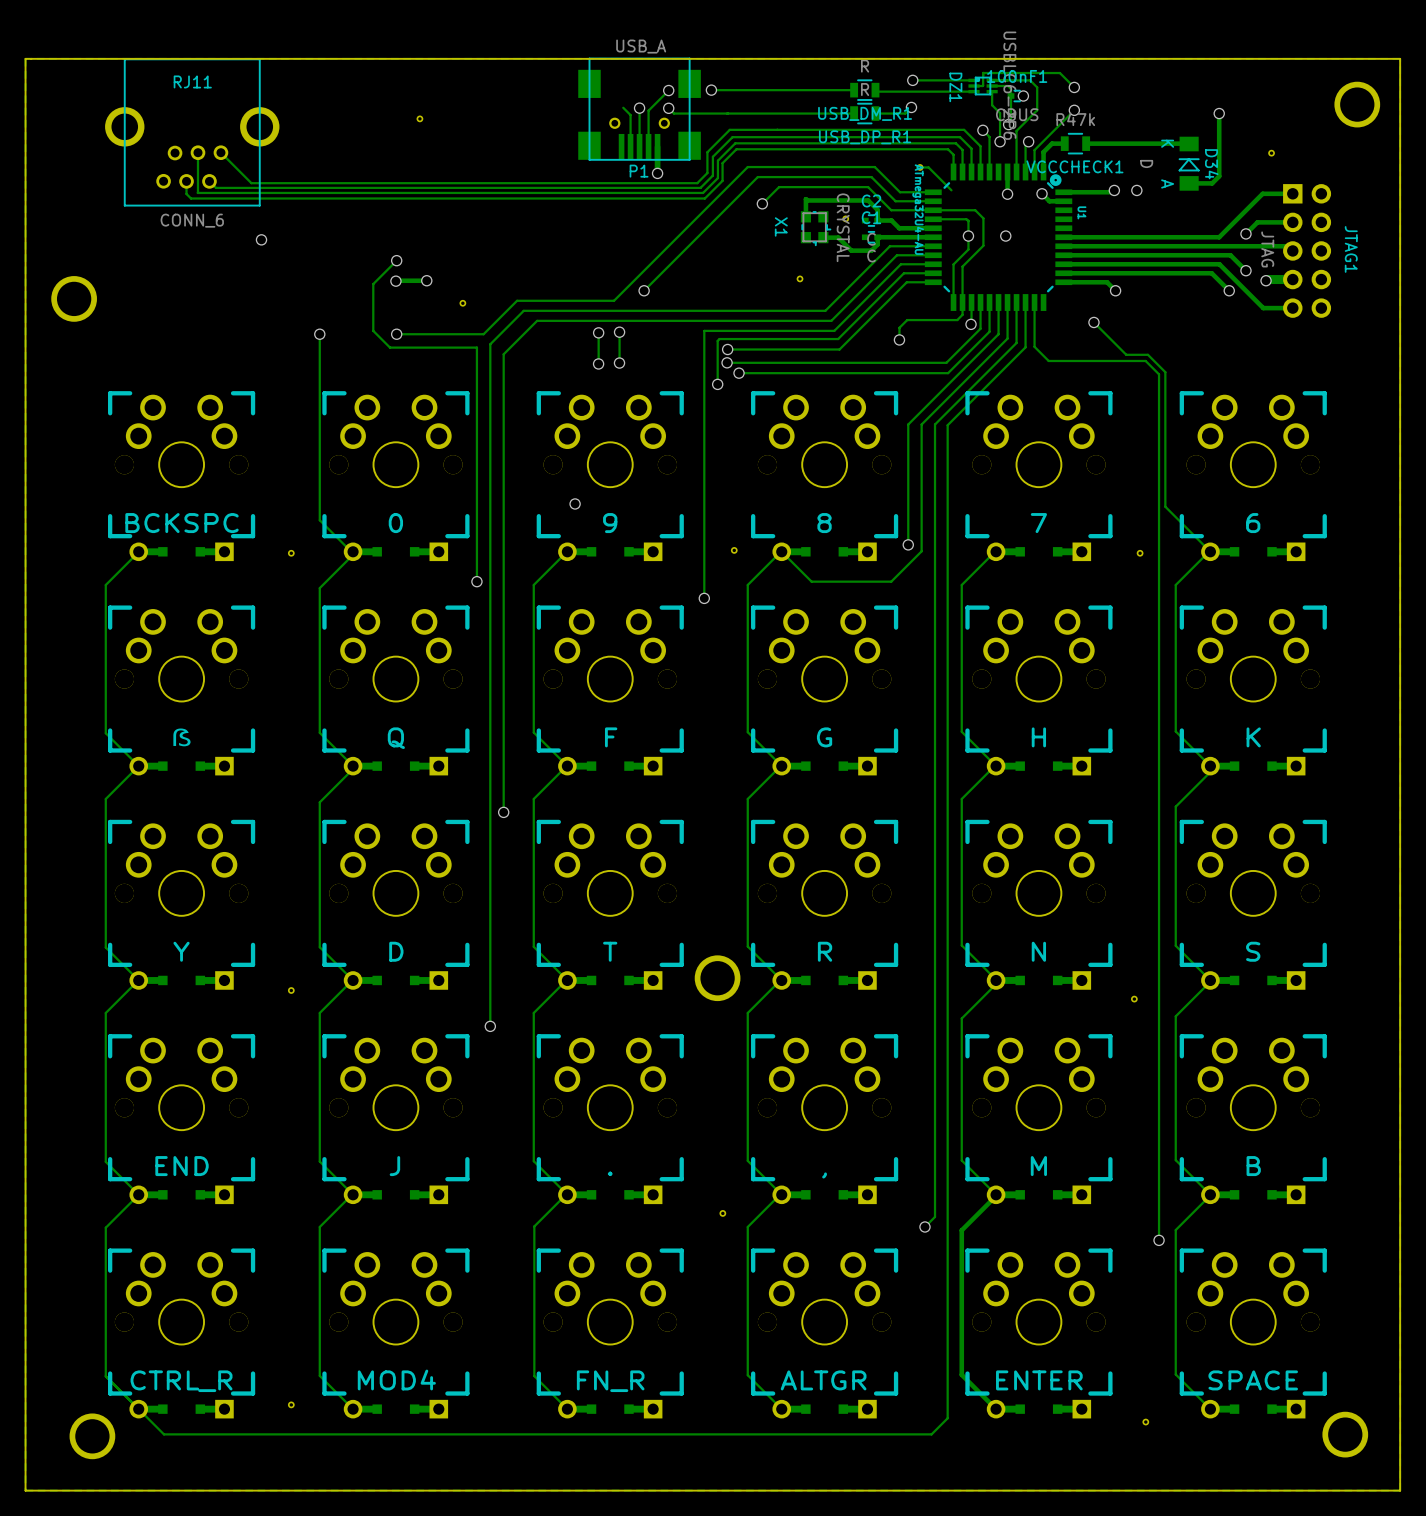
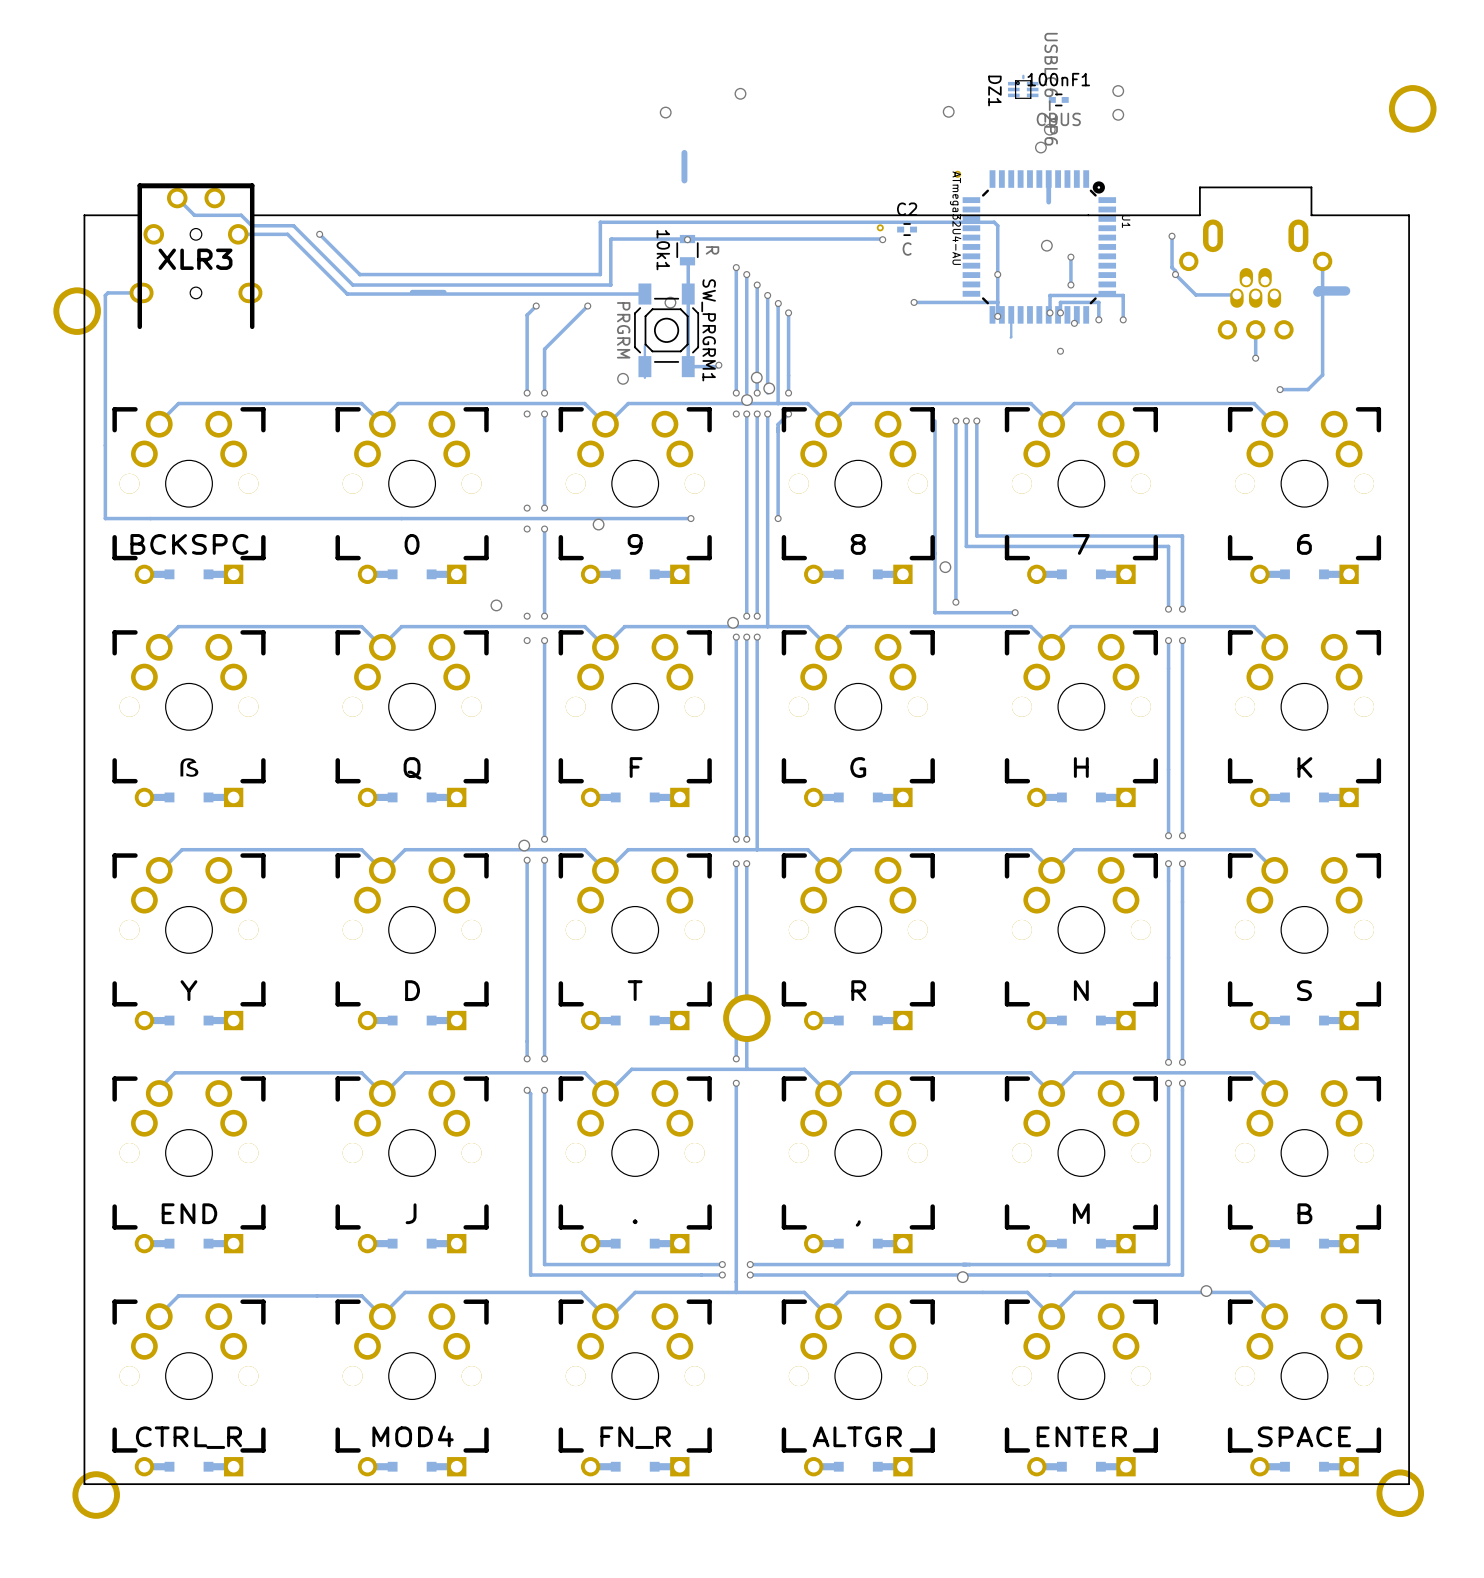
board edge: (1400, 58) (25, 58) (25, 1490) (1400, 1490) (1400, 58) -> (1311, 187) (1311, 215) (1409, 215) (1409, 1484) (84, 1484) (84, 215) (140, 215) (140, 187) (251, 187) (251, 215) (1199, 215) (1199, 187) (1311, 187)
track: (983, 73) (1059, 73) (1074, 87) -> none
track: (983, 75) (983, 85) (974, 86) -> none
via: (912, 80) -> none
track: (974, 80) (912, 80) -> none
track: (992, 80) (1030, 80) (1037, 87) (1037, 110) (1016, 130) (1016, 172) -> none
track: (992, 86) (1008, 86) (1011, 88) (1011, 122) (1008, 124) -> none
track: (668, 90) (648, 110) (648, 146) -> none
via: (668, 90) -> none
track: (854, 90) (711, 90) -> none
USB_DM_R1: R (864, 90) -> none
track: (875, 90) (974, 91) -> none
track: (994, 91) (992, 91) (992, 105) (1000, 113) (1000, 141) -> none
via: (1023, 96) -> none
track: (623, 107) (630, 115) (630, 146) -> none
track: (911, 107) (905, 113) (875, 113) -> none
track: (639, 108) (639, 146) -> none
track: (668, 108) (673, 113) (854, 113) -> none
via: (668, 108) -> none
P1: USB_A (639, 109) -> none
track: (1074, 110) (1034, 150) (1034, 172) -> none
USB_DP_R1: R (864, 113) -> none
track: (1219, 113) (1219, 176) (1212, 183) (1189, 183) -> none
via: (1219, 113) -> none
part: (419, 118) -> none
track: (982, 130) (989, 136) (989, 172) -> none
via: (982, 130) -> none
RJ11: CONN_6 (192, 132) -> none
track: (1028, 141) (1025, 144) (1025, 172) -> none
via: (1028, 141) -> none
track: (1064, 143) (1052, 143) (1043, 152) (1043, 172) -> none
VCCCHECK1: R47k (1075, 143) -> none
track: (1086, 143) (1189, 144) -> none
track: (198, 152) (197, 192) (703, 192) (717, 178) (717, 160) (735, 143) (955, 143) (962, 149) (962, 172) -> none
track: (220, 152) (251, 183) (697, 183) (707, 173) (707, 152) (729, 129) (964, 129) (980, 146) (980, 172) -> none
part: (1271, 153) -> none
D34: D (1189, 163) -> none
track: (920, 167) (928, 167) (951, 190) -> none
track: (953, 172) (953, 154) (948, 149) (736, 149) (722, 163) (722, 180) (704, 198) (191, 198) (186, 194) (186, 181) -> none
track: (971, 172) (971, 148) (960, 137) (732, 137) (712, 156) (712, 175) (700, 187) (216, 187) (209, 181) -> none
via: (657, 173) -> none
track: none -> (177, 198) (194, 215) (241, 215) (251, 225) (293, 225) (352, 285) (610, 285) (611, 239) (882, 239)
track: (1114, 190) (1112, 192) (1063, 192) -> none
via: (1114, 190) -> none
via: (1136, 190) -> none
track: (933, 192) (900, 192) (874, 167) (747, 167) (614, 300) (517, 300) (483, 334) (396, 334) -> none
track: (1042, 193) (1049, 201) (1063, 201) -> none
via: (1042, 193) -> none
track: (1292, 193) (1262, 193) (1219, 237) (1063, 237) -> none
via: (1007, 194) -> none
track: (933, 201) (895, 201) (871, 177) (757, 177) (644, 290) -> none
track: (762, 203) (779, 187) (868, 187) (891, 210) (975, 210) (983, 218) (983, 245) (962, 266) (962, 314) (957, 320) (907, 320) (899, 327) (899, 339) -> none
via: (762, 203) -> none
track: (805, 216) (805, 199) (868, 200) (877, 210) (877, 220) (891, 220) (899, 228) (933, 228) -> none
track: (933, 219) (966, 219) (968, 221) -> none
track: (968, 220) (968, 249) (953, 264) (953, 302) -> none
track: (1292, 222) (1257, 222) (1245, 233) -> none
track: none -> (238, 234) (287, 234) (347, 294) (644, 294)
track: none -> (319, 234) (359, 274)
via: none -> (319, 234)
track: none -> (1172, 236) (1172, 267) (1175, 271) (1175, 274) (1195, 294) (1236, 294)
via: none -> (1172, 236)
X1: CRYSTAL (816, 228) -> none
via: none -> (687, 239)
via: none -> (882, 239)
via: (1245, 233) -> none
via: (968, 236) -> none
C1: C (871, 237) -> none
track: (933, 237) (877, 237) (877, 244) (871, 250) (851, 250) (838, 237) (823, 237) -> none
via: (261, 239) -> none
10k1: none -> R (687, 250)
part: none -> XLR3 (195, 256)
track: (933, 246) (889, 246) (825, 310) (523, 310) (490, 344) (490, 1026) -> none
track: (1063, 246) (1288, 246) (1292, 250) -> none
track: none -> (1070, 257) (1070, 285)
via: none -> (1070, 257)
JTAG1: JTAG (1307, 250) -> none
track: none -> (687, 261) (688, 366) (718, 365)
track: none -> (1322, 261) (1322, 374) (1307, 389) (1280, 389)
track: (933, 255) (896, 255) (831, 320) (537, 320) (503, 354) (503, 812) -> none
track: (1063, 255) (1230, 255) (1245, 270) -> none
track: none -> (736, 267) (736, 393)
via: none -> (736, 267)
track: (396, 260) (373, 284) (373, 330) (390, 347) (476, 347) (476, 581) -> none
via: (396, 260) -> none
track: none -> (359, 274) (600, 274) (600, 222) (994, 222) (997, 225) (997, 316)
track: none -> (746, 274) (746, 393)
via: none -> (746, 274)
via: none -> (997, 274)
via: none -> (1175, 274)
track: (933, 264) (900, 264) (834, 330) (704, 330) (704, 598) -> none
track: (1063, 264) (1219, 264) (1263, 308) (1292, 308) -> none
part: none -> (1255, 279)
via: (1245, 270) -> none
track: none -> (757, 285) (757, 393)
via: none -> (757, 285)
track: (933, 273) (903, 273) (838, 339) (719, 339) (717, 340) (717, 384) -> none
via: none -> (1070, 285)
track: (1063, 273) (1211, 273) (1229, 290) -> none
part: (800, 278) -> none
via: (426, 280) -> none
via: (1266, 280) -> none
track: none -> (141, 292) (107, 292) (105, 295) (105, 518) (690, 518)
via: (395, 281) -> none
track: (933, 282) (906, 282) (839, 349) (727, 349) -> none
track: (1063, 282) (1107, 282) (1115, 290) -> none
track: none -> (767, 295) (767, 393)
via: none -> (767, 295)
via: none -> (914, 302)
track: none -> (997, 302) (914, 302)
via: (1115, 290) -> none
via: (1229, 290) -> none
track: none -> (778, 303) (778, 403)
via: none -> (778, 303)
track: none -> (536, 306) (527, 315) (527, 393)
via: none -> (536, 306)
track: none -> (587, 306) (544, 349) (544, 393)
via: none -> (587, 306)
track: none -> (788, 312) (788, 393)
via: none -> (788, 312)
track: none -> (1050, 312) (1050, 295) (1123, 295) (1123, 319)
via: none -> (1050, 312)
track: none -> (1060, 312) (1060, 302) (1098, 302) (1098, 319)
via: none -> (1060, 312)
track: (980, 302) (980, 328) (946, 362) (727, 362) -> none
track: (989, 302) (989, 331) (948, 373) (739, 373) -> none
track: (998, 302) (998, 334) (908, 424) (908, 544) -> none
track: (1007, 302) (1007, 338) (921, 424) (921, 551) (891, 581) (811, 581) (781, 551) -> none
track: (1016, 302) (1016, 342) (935, 424) (935, 1216) (924, 1226) -> none
track: (1025, 302) (1025, 347) (947, 425) (947, 1418) (931, 1434) (163, 1434) (105, 1376) (105, 1227) (138, 1194) -> none
track: (1034, 302) (1034, 346) (1048, 360) (1145, 360) (1159, 374) (1159, 1240) -> none
part: (462, 303) -> none
via: none -> (997, 316)
via: none -> (1098, 319)
via: none -> (1123, 319)
via: none -> (1074, 323)
track: none -> (1255, 329) (1255, 358)
SW_PRGRM1: none -> PRGRM (666, 330)
track: (1093, 322) (1126, 354) (1147, 354) (1165, 372) (1165, 506) (1210, 551) -> none
via: (1093, 322) -> none
via: (971, 324) -> none
track: (598, 332) (598, 363) -> none
via: (598, 332) -> none
via: (619, 332) -> none
track: (319, 334) (319, 520) (353, 551) (353, 554) (319, 588) (319, 732) (353, 766) -> none
via: (319, 334) -> none
via: (396, 334) -> none
via: none -> (1060, 351)
via: (899, 339) -> none
via: none -> (1255, 358)
via: (727, 349) -> none
via: none -> (718, 365)
via: (619, 363) -> none
via: none -> (1280, 389)
via: none -> (527, 393)
via: none -> (544, 393)
via: none -> (736, 393)
via: none -> (757, 393)
via: none -> (788, 393)
via: none -> (527, 413)
track: none -> (544, 413) (544, 508)
via: none -> (544, 413)
via: none -> (736, 413)
track: none -> (746, 413) (746, 616)
via: none -> (746, 413)
track: none -> (757, 413) (757, 616)
via: none -> (757, 413)
track: none -> (767, 413) (767, 626)
via: none -> (767, 413)
track: none -> (788, 413) (778, 424) (778, 518)
via: none -> (788, 413)
track: none -> (934, 420) (934, 612) (1015, 612)
track: none -> (955, 420) (955, 602)
via: none -> (955, 420)
track: none -> (966, 420) (966, 546) (1168, 546) (1168, 609)
via: none -> (966, 420)
track: none -> (976, 420) (976, 535) (1182, 535) (1182, 609)
via: none -> (976, 420)
track: none -> (1274, 424) (1254, 403) (1074, 403) (1053, 424) (1030, 403) (851, 403) (830, 424) (807, 403) (628, 403) (607, 424) (584, 403) (398, 403) (382, 419) (382, 424) (361, 403) (178, 403) (159, 424)
via: none -> (527, 508)
via: none -> (544, 508)
via: none -> (690, 518)
via: none -> (778, 518)
via: none -> (527, 529)
track: none -> (544, 529) (544, 616)
via: none -> (544, 529)
part: (734, 550) -> none
track: (138, 551) (105, 585) (105, 733) (138, 766) -> none
track: (567, 551) (533, 585) (533, 732) (567, 766) (533, 799) (533, 946) (567, 980) (533, 1012) (533, 1161) (567, 1194) (534, 1226) (534, 1376) (567, 1409) -> none
track: (780, 551) (747, 585) (747, 732) (781, 766) -> none
track: (996, 551) (961, 585) (961, 731) (996, 766) (961, 799) (961, 945) (996, 979) (996, 984) (961, 1018) (961, 1160) (996, 1194) (961, 1230) (961, 1374) (996, 1409) -> none
track: (1210, 551) (1175, 585) (1175, 731) (1210, 766) -> none
part: (291, 553) -> none
part: (1140, 553) -> none
via: none -> (955, 602)
via: none -> (1168, 609)
via: none -> (1182, 609)
via: none -> (1015, 612)
via: none -> (527, 616)
via: none -> (544, 616)
via: none -> (746, 616)
via: none -> (757, 616)
track: none -> (736, 637) (736, 839)
via: none -> (736, 637)
track: none -> (746, 637) (746, 839)
via: none -> (746, 637)
track: none -> (757, 637) (757, 849)
via: none -> (757, 637)
via: none -> (527, 640)
track: none -> (544, 640) (544, 839)
via: none -> (544, 640)
track: none -> (1168, 640) (1168, 835)
via: none -> (1168, 640)
track: none -> (1182, 640) (1182, 835)
via: none -> (1182, 640)
track: none -> (1274, 647) (1254, 626) (1070, 626) (1051, 647) (1030, 626) (847, 626) (828, 647) (807, 626) (624, 626) (605, 647) (584, 626) (401, 626) (382, 647) (361, 626) (178, 626) (159, 647)
track: (138, 766) (105, 799) (105, 947) (138, 980) (105, 1012) (105, 1161) (138, 1194) -> none
track: (780, 766) (747, 799) (747, 946) (781, 980) -> none
track: (1210, 766) (1210, 772) (1175, 806) (1175, 945) (1210, 980) (1175, 1016) (1175, 1160) (1210, 1194) -> none
track: (353, 769) (319, 802) (319, 947) (353, 980) -> none
via: none -> (1168, 835)
via: none -> (1182, 835)
via: none -> (544, 839)
via: none -> (736, 839)
via: none -> (746, 839)
track: none -> (527, 860) (527, 1058)
via: none -> (527, 860)
track: none -> (544, 860) (544, 1058)
via: none -> (544, 860)
track: none -> (736, 863) (736, 1058)
via: none -> (736, 863)
track: none -> (746, 863) (746, 1069)
via: none -> (746, 863)
track: none -> (1168, 863) (1168, 1062)
via: none -> (1168, 863)
track: none -> (1182, 863) (1182, 1062)
via: none -> (1182, 863)
track: none -> (1274, 870) (1254, 849) (1074, 849) (1053, 870) (1030, 849) (851, 849) (830, 870) (807, 849) (628, 849) (607, 870) (584, 849) (405, 849) (384, 870) (361, 849) (182, 849) (159, 870)
track: (352, 980) (319, 1012) (319, 1161) (353, 1194) -> none
track: (780, 980) (747, 1012) (747, 1160) (781, 1194) -> none
part: (291, 990) -> none
part: (1134, 999) -> none
via: none -> (527, 1058)
via: none -> (544, 1058)
via: none -> (736, 1058)
via: none -> (1168, 1062)
via: none -> (1182, 1062)
via: (490, 1026) -> none
track: none -> (736, 1083) (736, 1292)
via: none -> (736, 1083)
track: none -> (1168, 1083) (1168, 1264) (750, 1264)
via: none -> (1168, 1083)
track: none -> (1182, 1083) (1182, 1275) (750, 1275)
via: none -> (1182, 1083)
track: none -> (527, 1090) (530, 1093) (530, 1275) (722, 1275)
via: none -> (527, 1090)
track: none -> (544, 1090) (544, 1264) (722, 1264)
via: none -> (544, 1090)
track: none -> (1274, 1093) (1254, 1072) (1074, 1072) (1053, 1093) (1030, 1072) (851, 1072) (828, 1093) (804, 1069) (631, 1069) (607, 1093) (584, 1072) (405, 1072) (384, 1093) (361, 1072) (175, 1072) (159, 1088) (159, 1093)
track: (351, 1194) (319, 1226) (319, 1375) (353, 1409) -> none
track: (779, 1194) (747, 1226) (747, 1375) (781, 1409) -> none
track: (1210, 1194) (1175, 1230) (1175, 1374) (1210, 1409) -> none
part: (722, 1213) -> none
via: none -> (722, 1264)
via: none -> (750, 1264)
via: none -> (722, 1275)
via: none -> (750, 1275)
track: none -> (1274, 1316) (1250, 1292) (1074, 1292) (1051, 1316) (1027, 1292) (847, 1292) (828, 1311) (828, 1316) (804, 1292) (635, 1292) (611, 1316) (605, 1316) (581, 1292) (405, 1292) (382, 1316) (361, 1295) (178, 1295) (159, 1316)
part: (291, 1404) -> none
part: (1145, 1422) -> none

